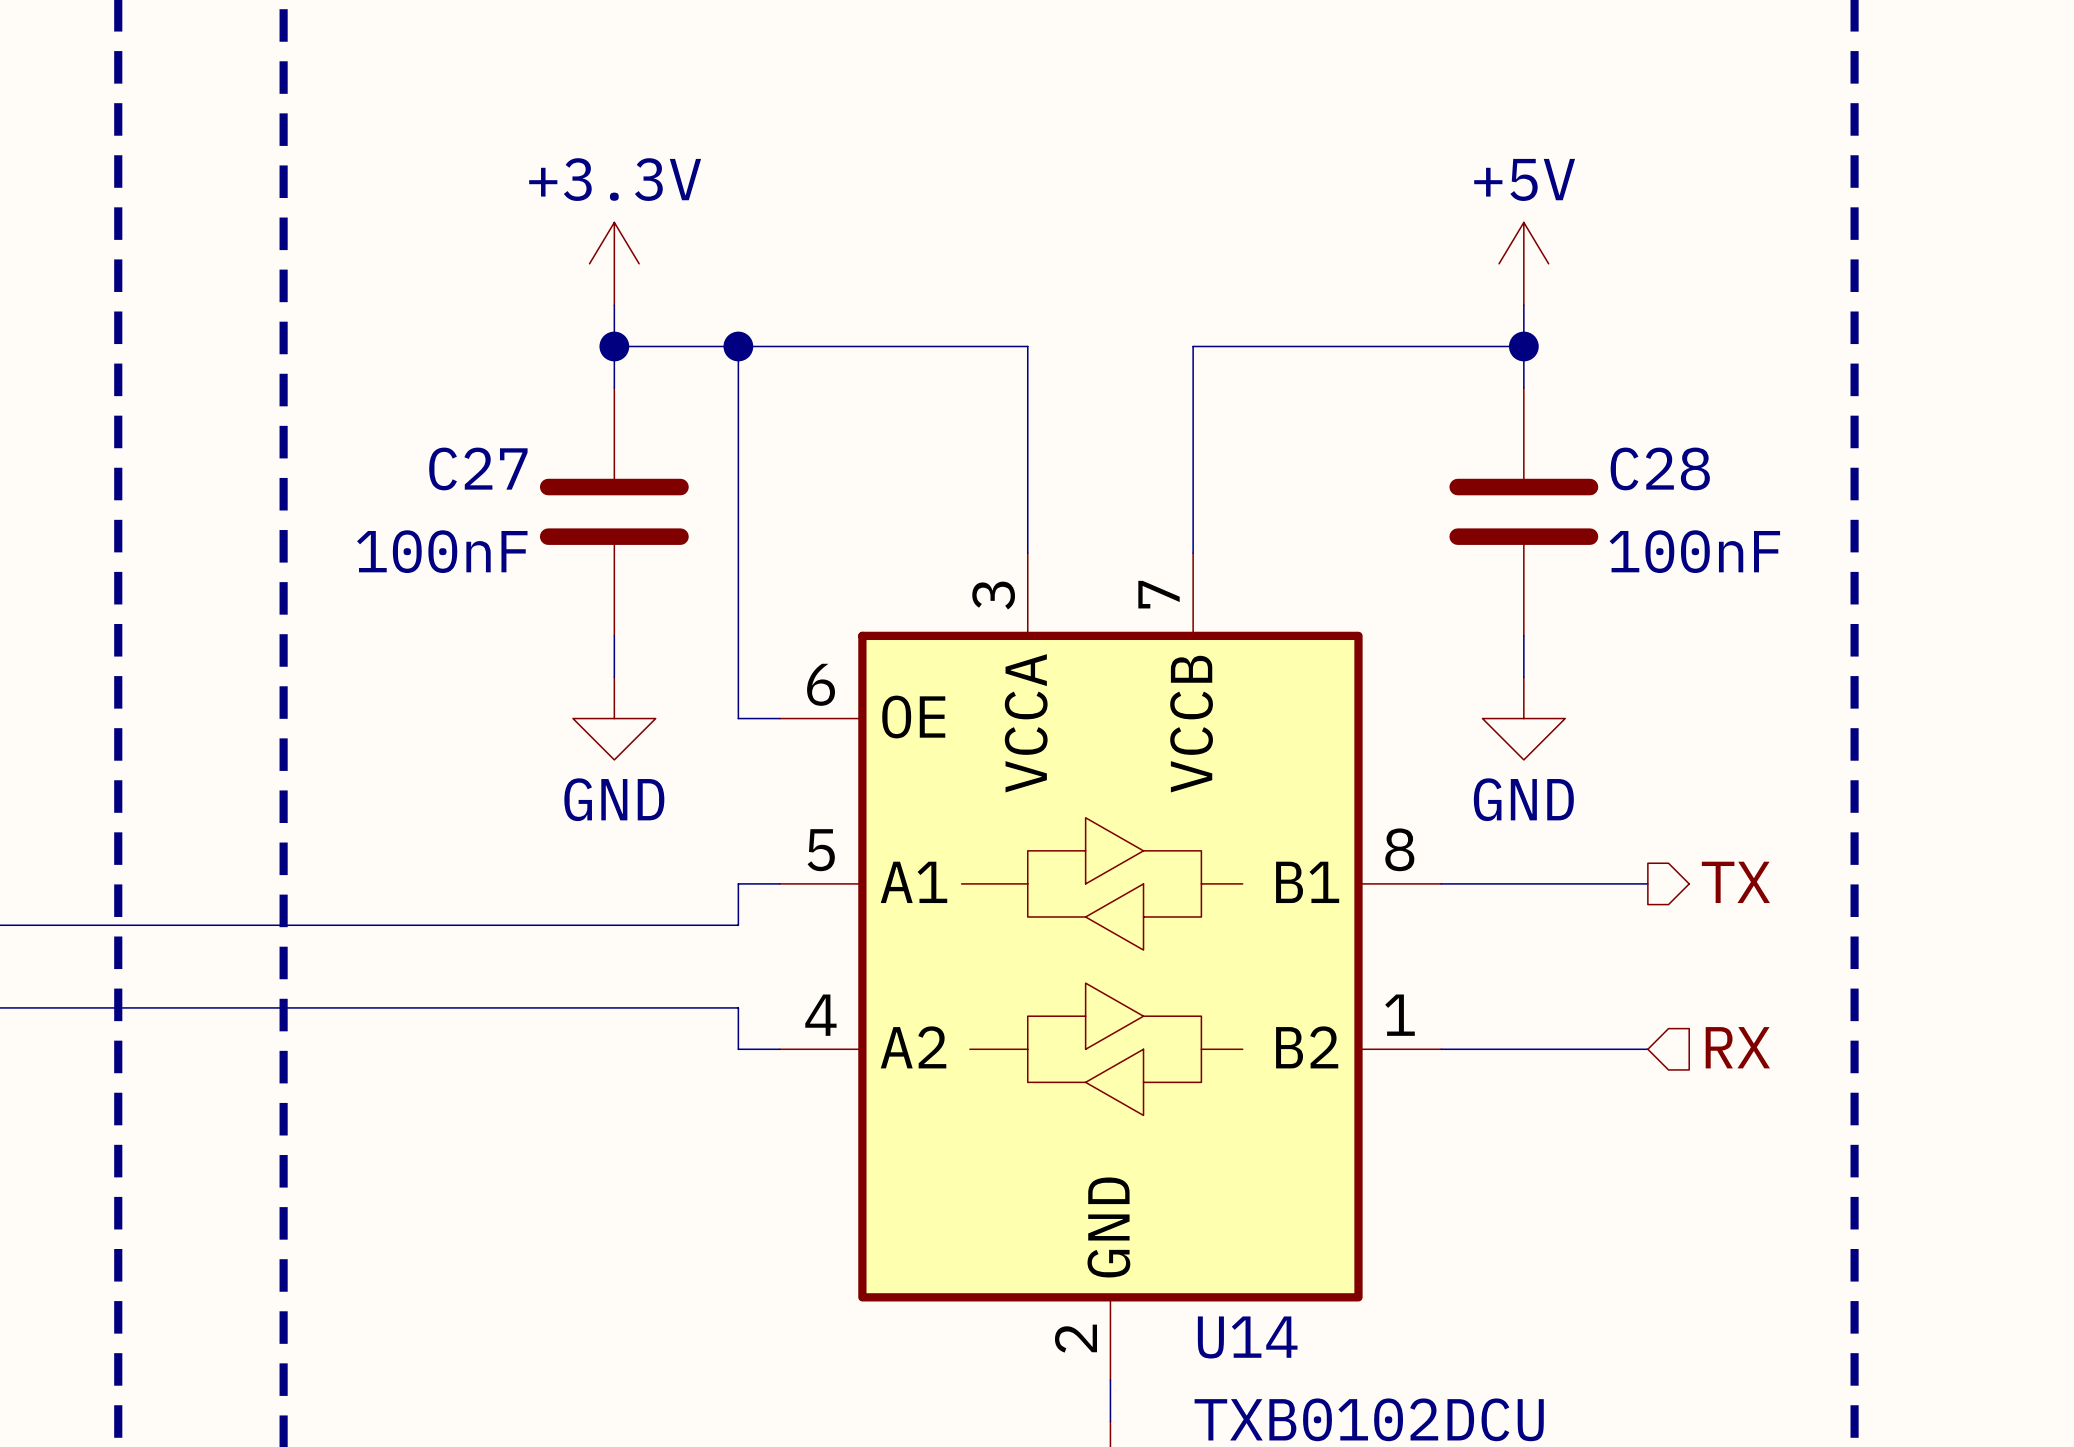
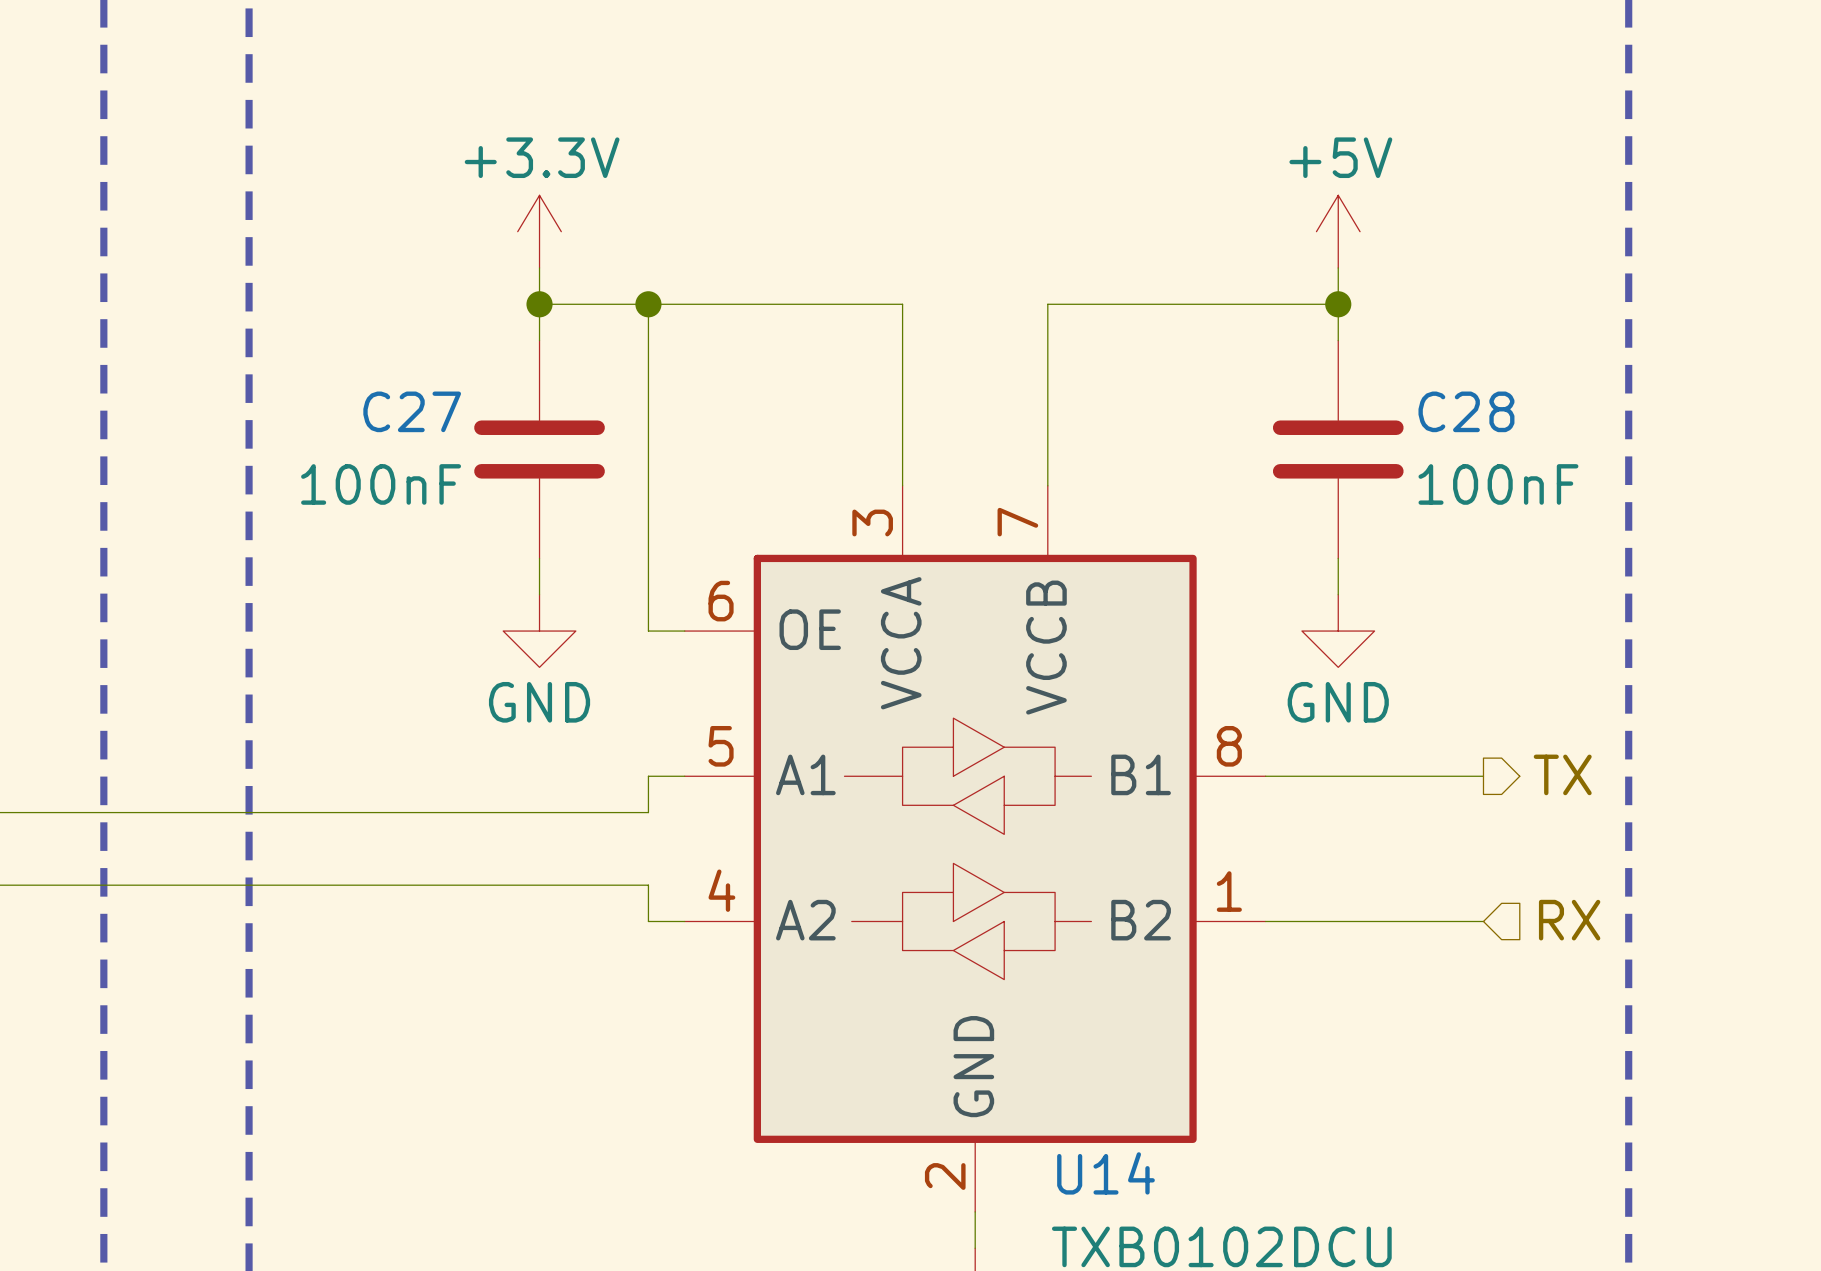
hierarchical label position: TX (1735, 882) -> TX (1562, 774)
wire: none -> (1447, 776) (1483, 776)
hierarchical label position: RX (1737, 1047) -> RX (1569, 920)
wire: none -> (1447, 921) (1483, 921)

